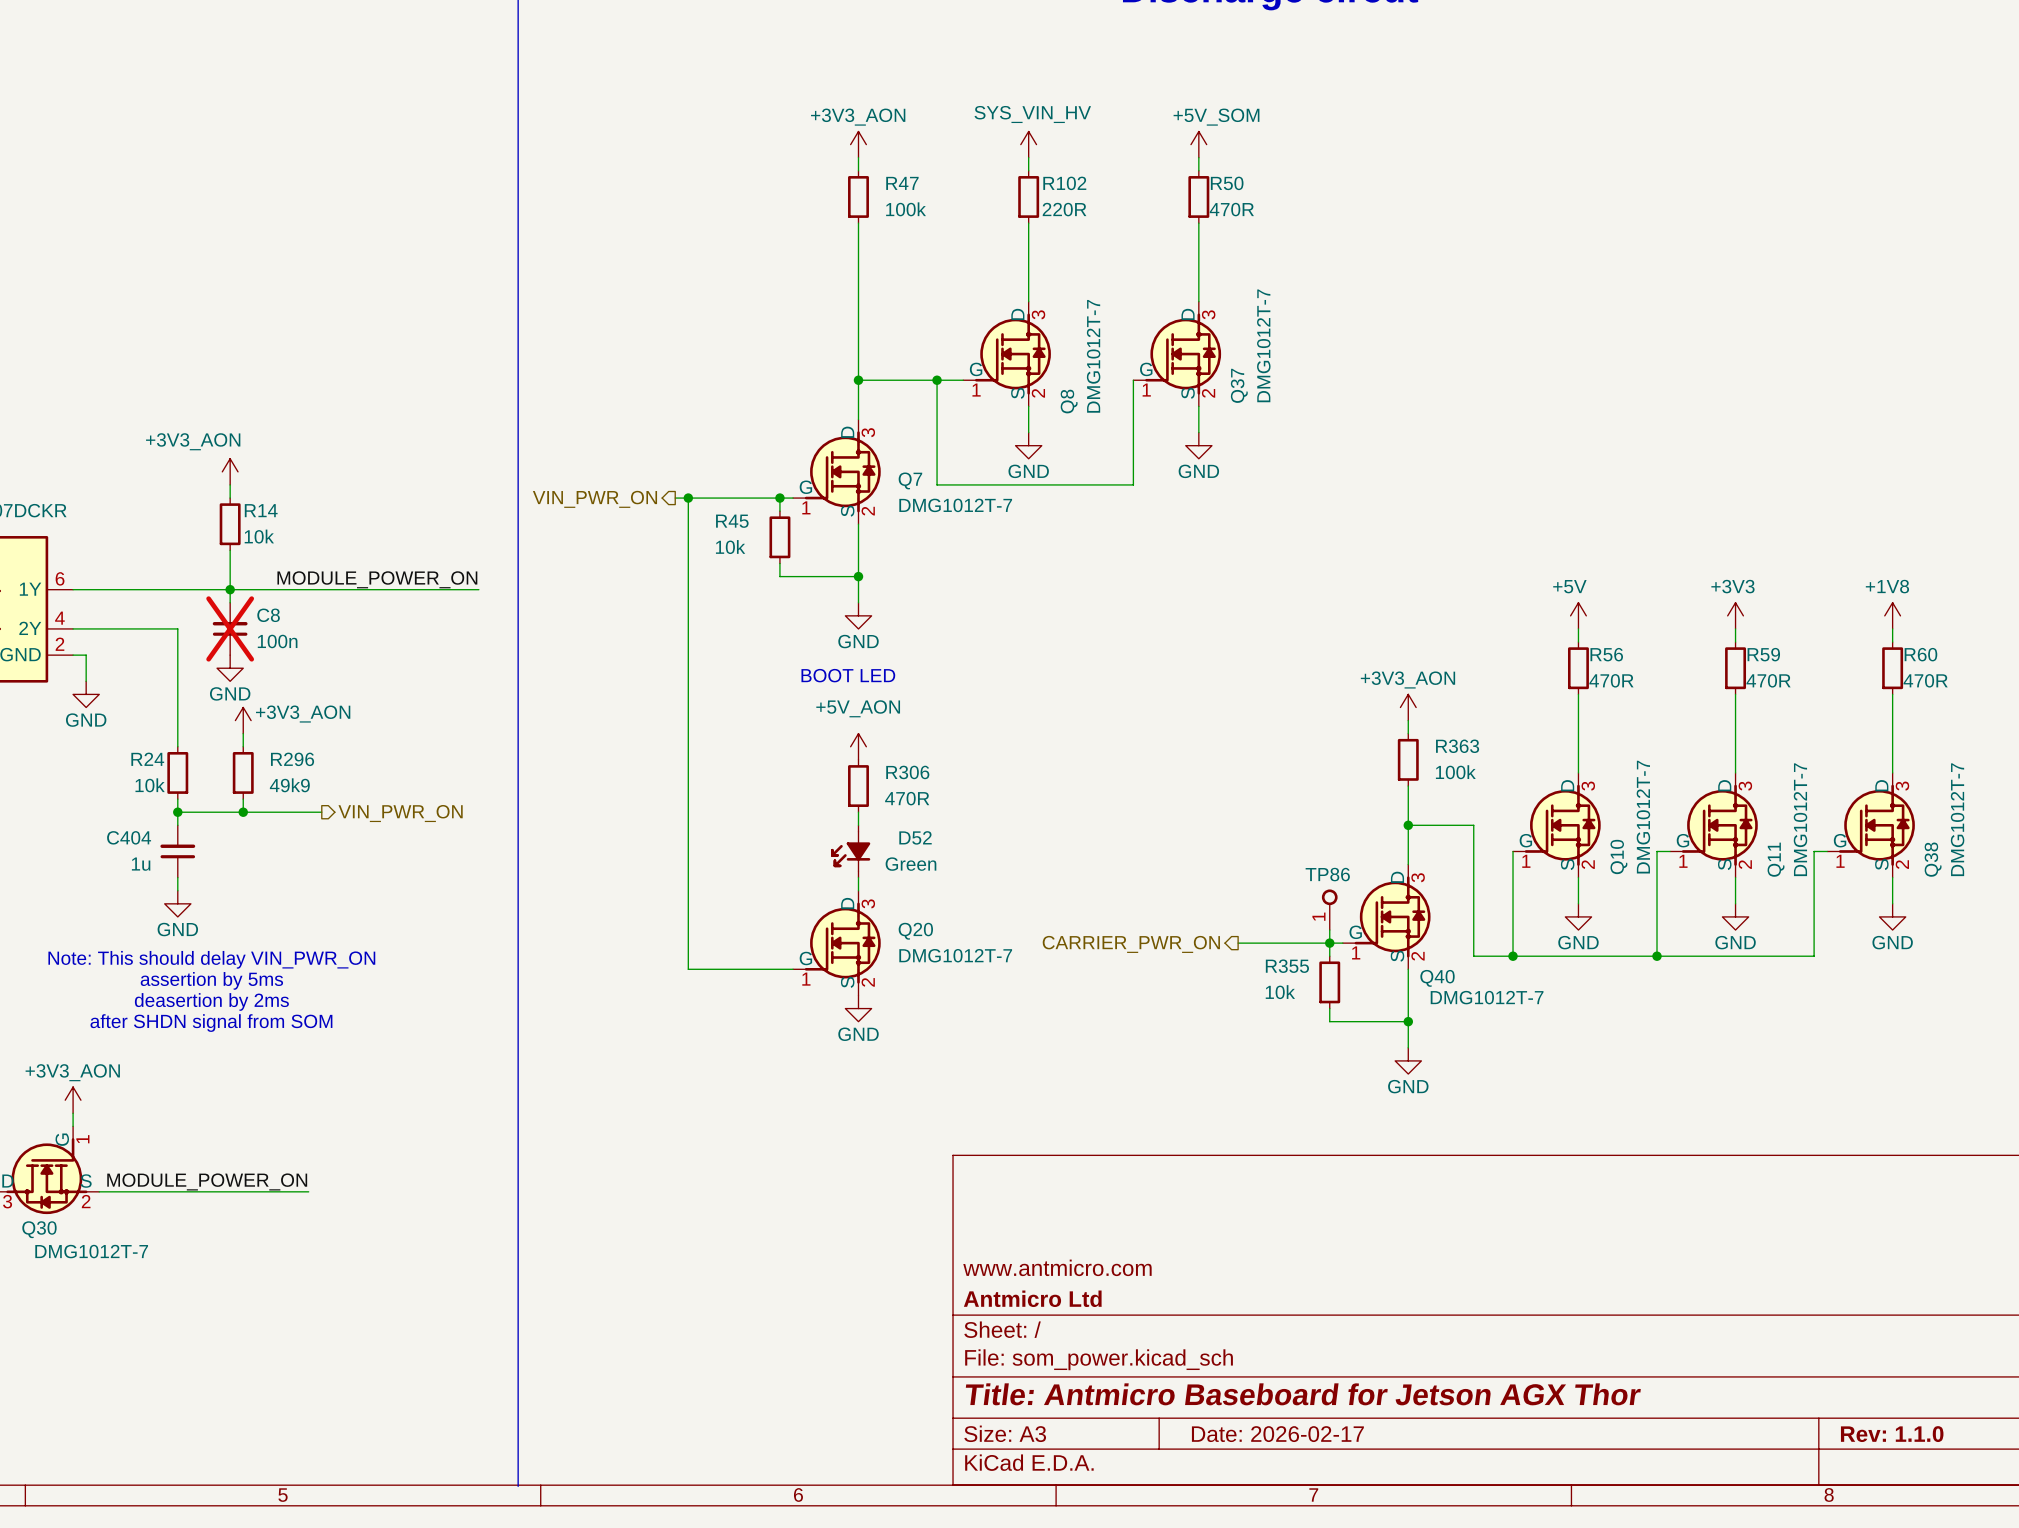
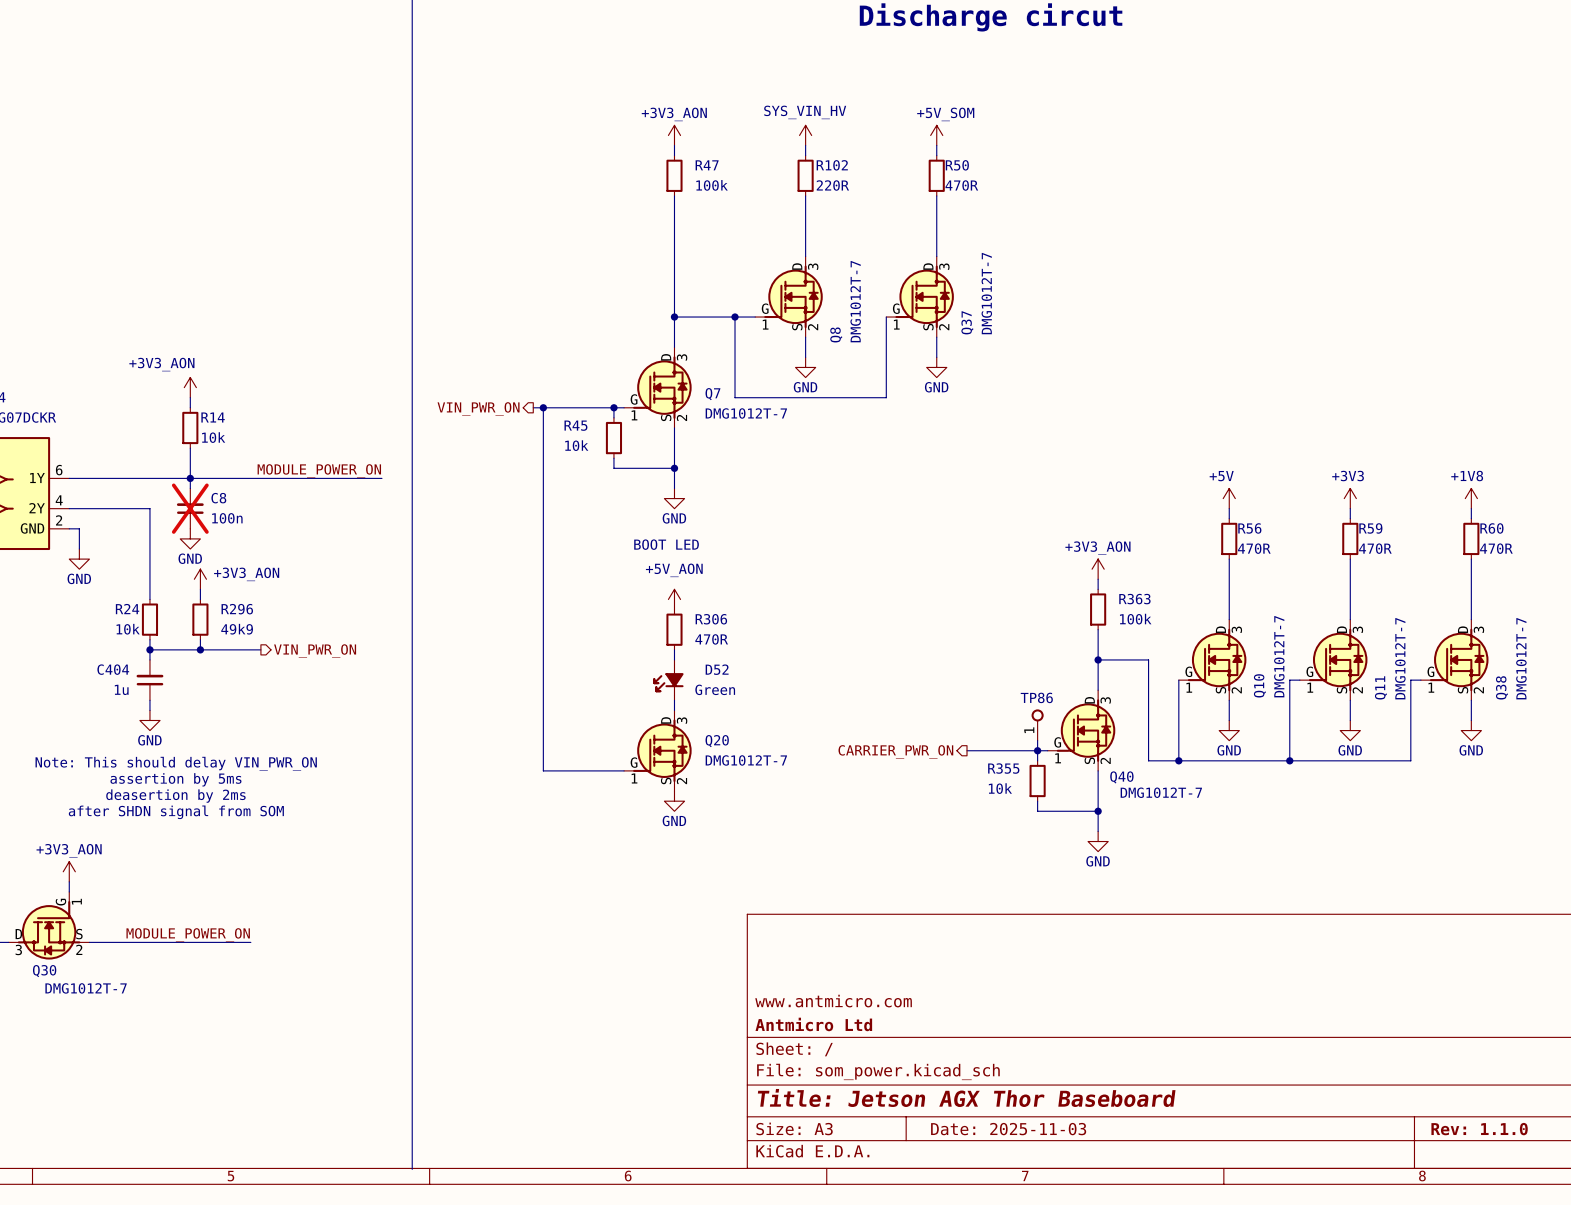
title block: Title: Antmicro Baseboard for Jetson AGX Thor (1303, 1394) -> Title: Jetson AGX Thor Baseboard (966, 1097)
title block: Date: 2026-02-17 (1277, 1434) -> Date: 2025-11-03 (1008, 1129)

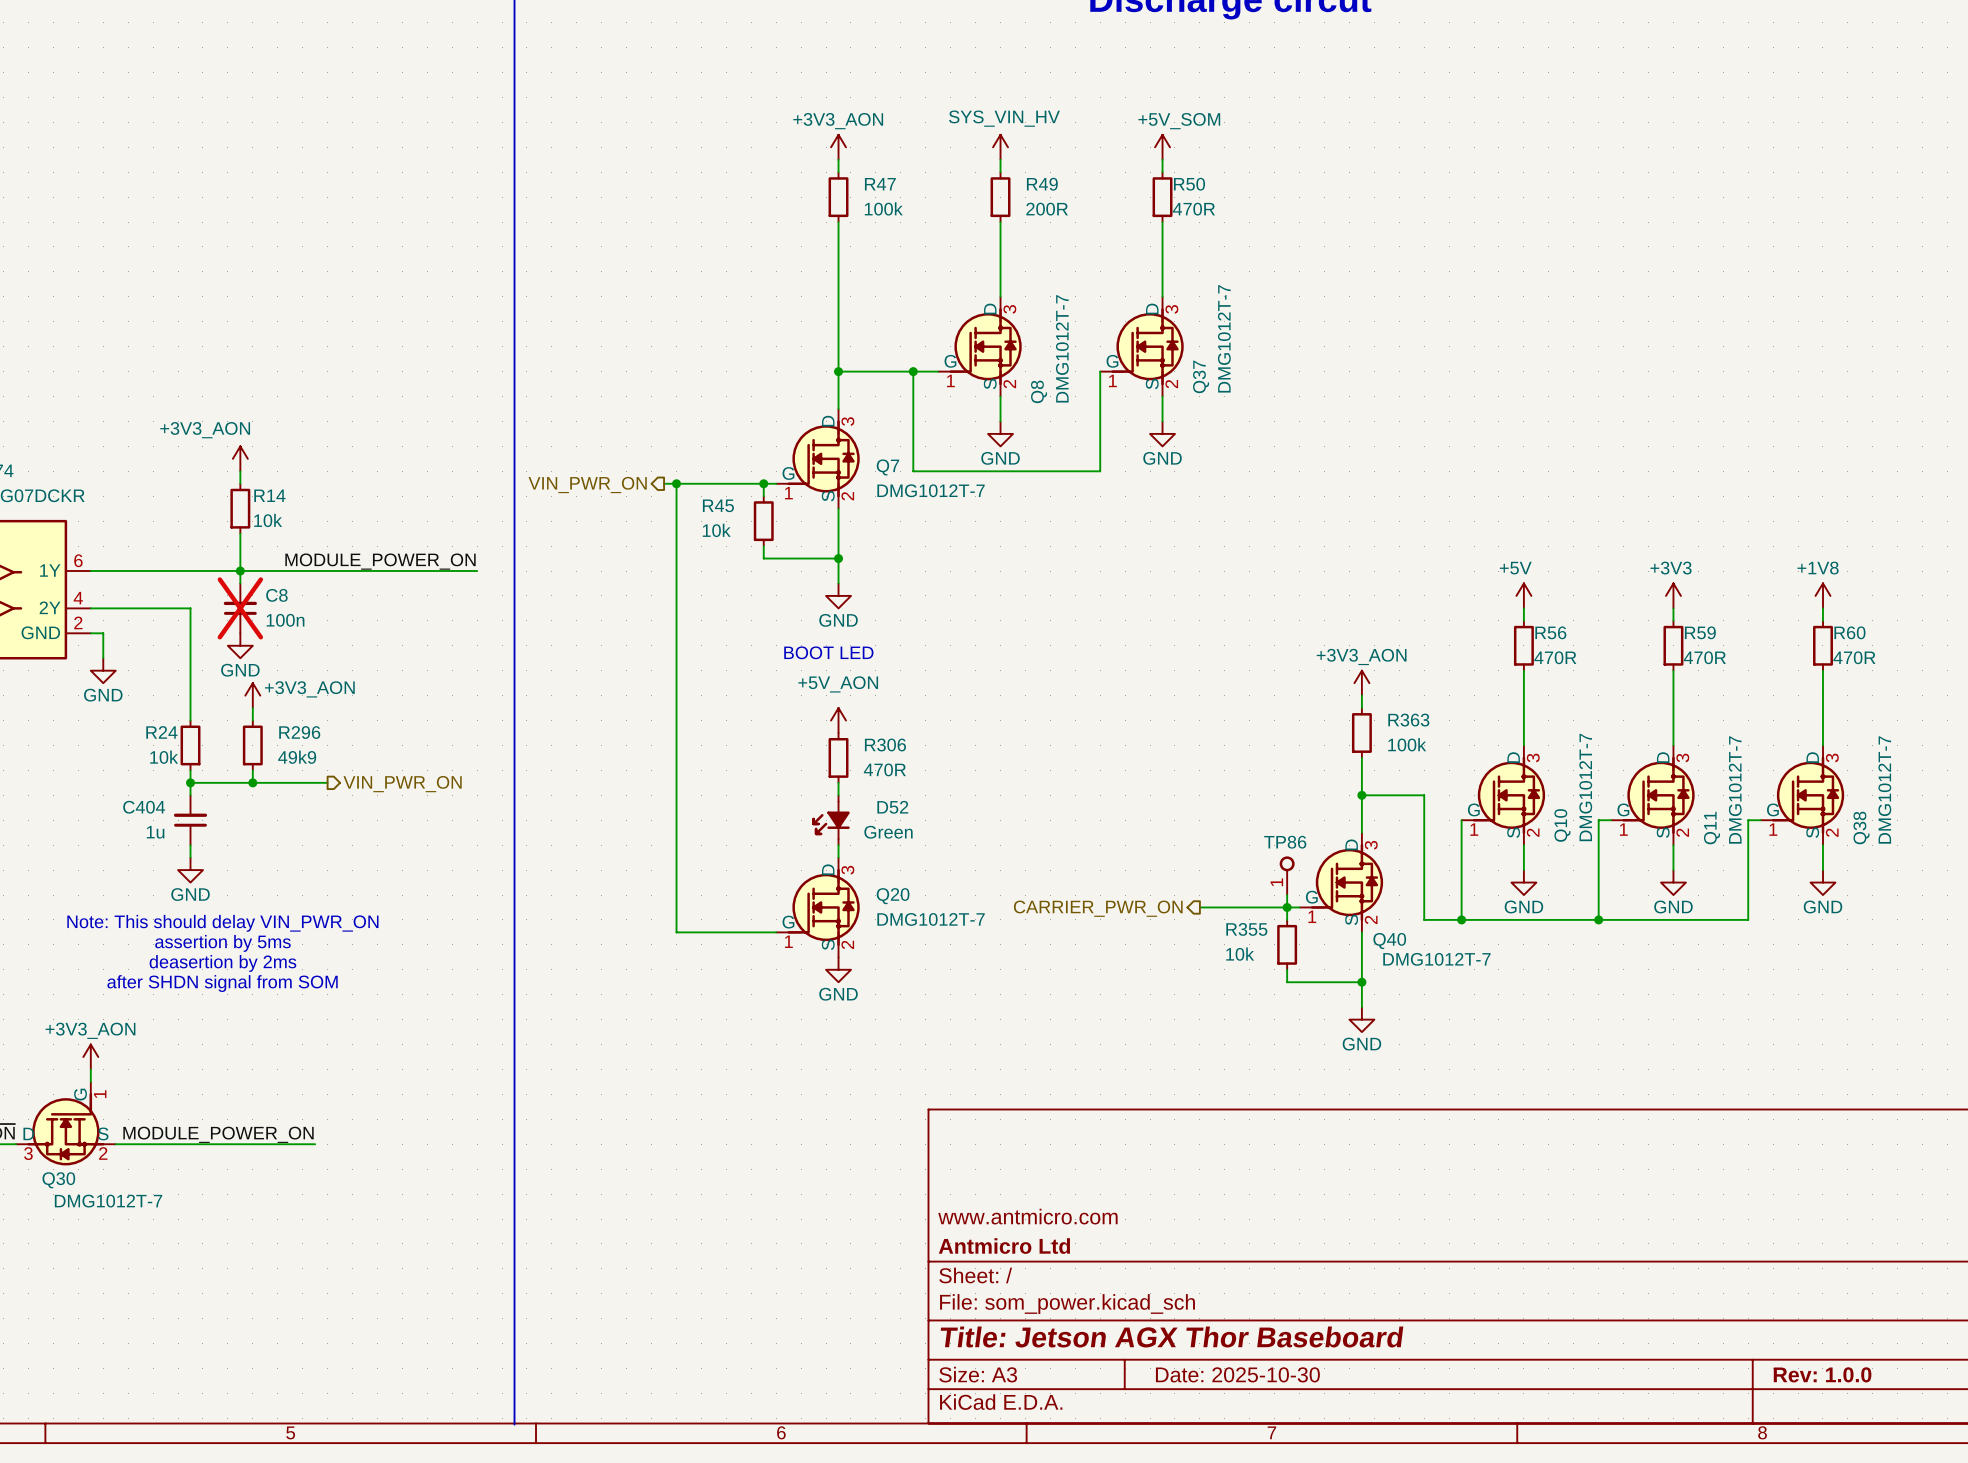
R102 name: R102 (832, 165) -> R49 (1042, 184)
R102 text: 220R (832, 185) -> 200R (1047, 209)
title block: Date: 2025-11-03 (1008, 1129) -> Date: 2025-10-30 (1237, 1374)
title block: Rev: 1.1.0 (1479, 1129) -> Rev: 1.0.0 (1822, 1374)

